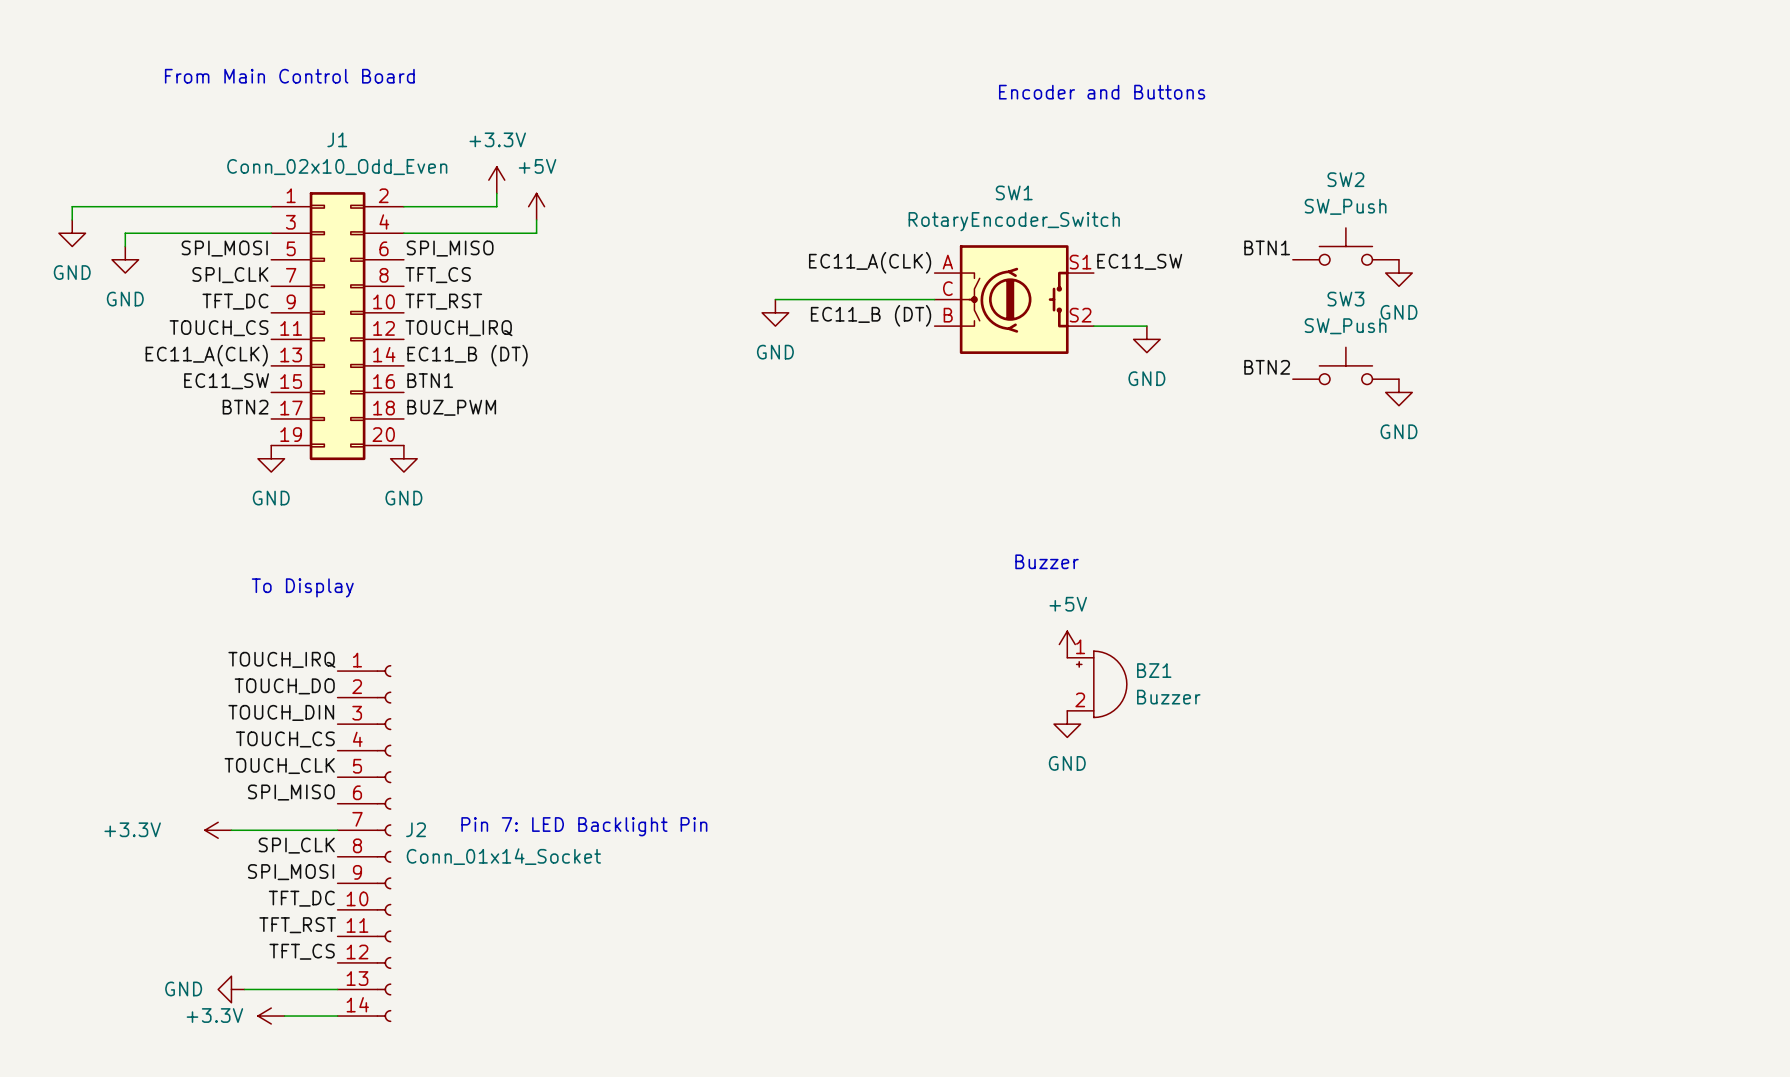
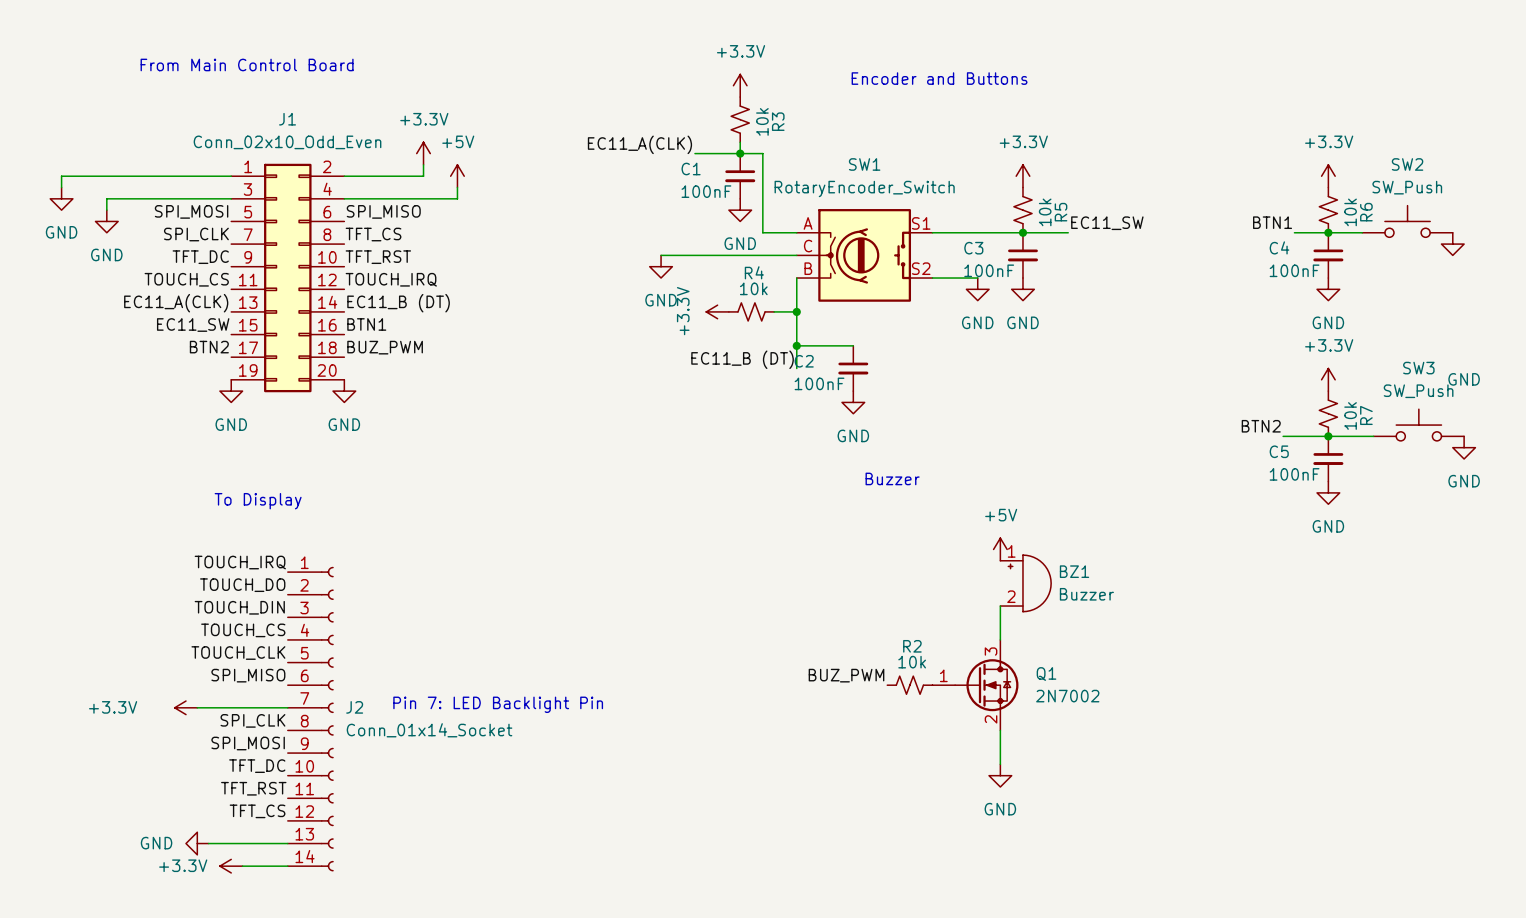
power symbol: none -> +3.3V (740, 85)
R3: none -> 10k (740, 119)
wire: none -> (740, 142) (740, 153)
wire: none -> (694, 153) (762, 153) (762, 232) (796, 232)
junction: none -> (740, 153)
C1: none -> 100nF (740, 176)
power symbol: none -> +3.3V (1022, 176)
power symbol: none -> +3.3V (1328, 176)
power symbol: none -> GND (740, 210)
R5: none -> 10k (1022, 210)
SW2 position: (1345, 246) -> (1407, 221)
R6: none -> 10k (1328, 210)
label position: BTN1 (1267, 247) -> BTN1 (1272, 222)
label position: EC11_SW (1139, 261) -> EC11_SW (1107, 223)
label position: EC11_A(CLK) (870, 262) -> EC11_A(CLK) (639, 144)
wire: none -> (932, 232) (1068, 232)
junction: none -> (1022, 232)
power symbol: GND (1398, 273) -> none
wire: none -> (1294, 232) (1362, 232)
junction: none -> (1328, 232)
power symbol: none -> GND (1452, 244)
C3: none -> 100nF (1022, 255)
C4: none -> 100nF (1328, 255)
label position: EC11_B (DT) (871, 315) -> EC11_B (DT) (742, 359)
wire: none -> (796, 278) (796, 368)
power symbol: none -> GND (1022, 289)
power symbol: none -> GND (1328, 289)
power symbol: none -> +3.3V (717, 311)
R4: none -> 10k (751, 311)
wire: none -> (774, 311) (796, 311)
junction: none -> (796, 311)
SW3 position: (1345, 365) -> (1418, 425)
label position: BTN2 (1267, 367) -> BTN2 (1261, 426)
power symbol: GND (1398, 392) -> none
wire: none -> (796, 345) (853, 345)
junction: none -> (796, 345)
C2: none -> 100nF (853, 368)
power symbol: none -> +3.3V (1328, 379)
power symbol: none -> GND (853, 402)
R7: none -> 10k (1328, 413)
wire: none -> (1283, 436) (1373, 436)
junction: none -> (1328, 436)
power symbol: none -> GND (1464, 447)
C5: none -> 100nF (1328, 458)
power symbol: none -> GND (1328, 492)
power symbol position: +5V (1067, 644) -> +5V (1000, 549)
BZ1 position: (1097, 684) -> (1025, 583)
wire: none -> (1000, 606) (1000, 639)
power symbol: GND (1067, 724) -> none
label: none -> BUZ_PWM (846, 675)
R2: none -> 10k (909, 685)
Q1: none -> 2N7002 (975, 685)
wire: none -> (1000, 730) (1000, 764)
power symbol: none -> GND (1000, 775)

